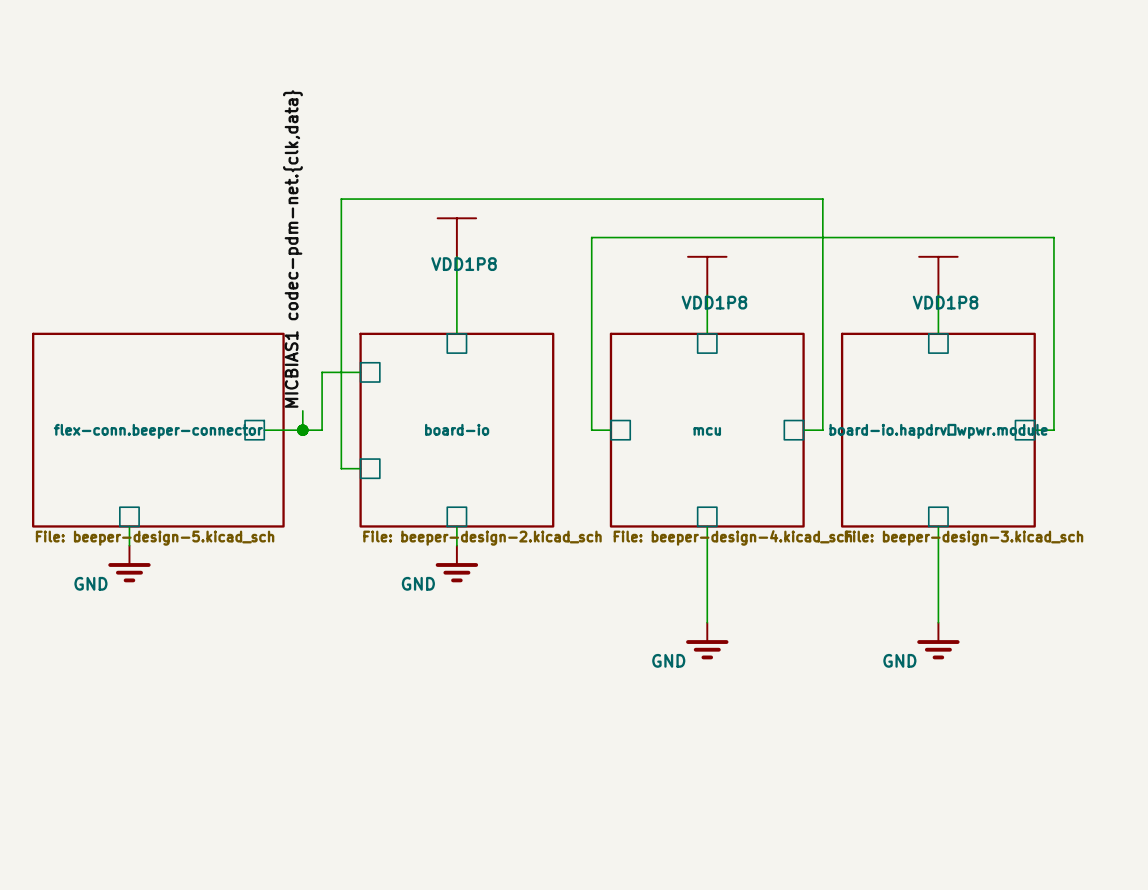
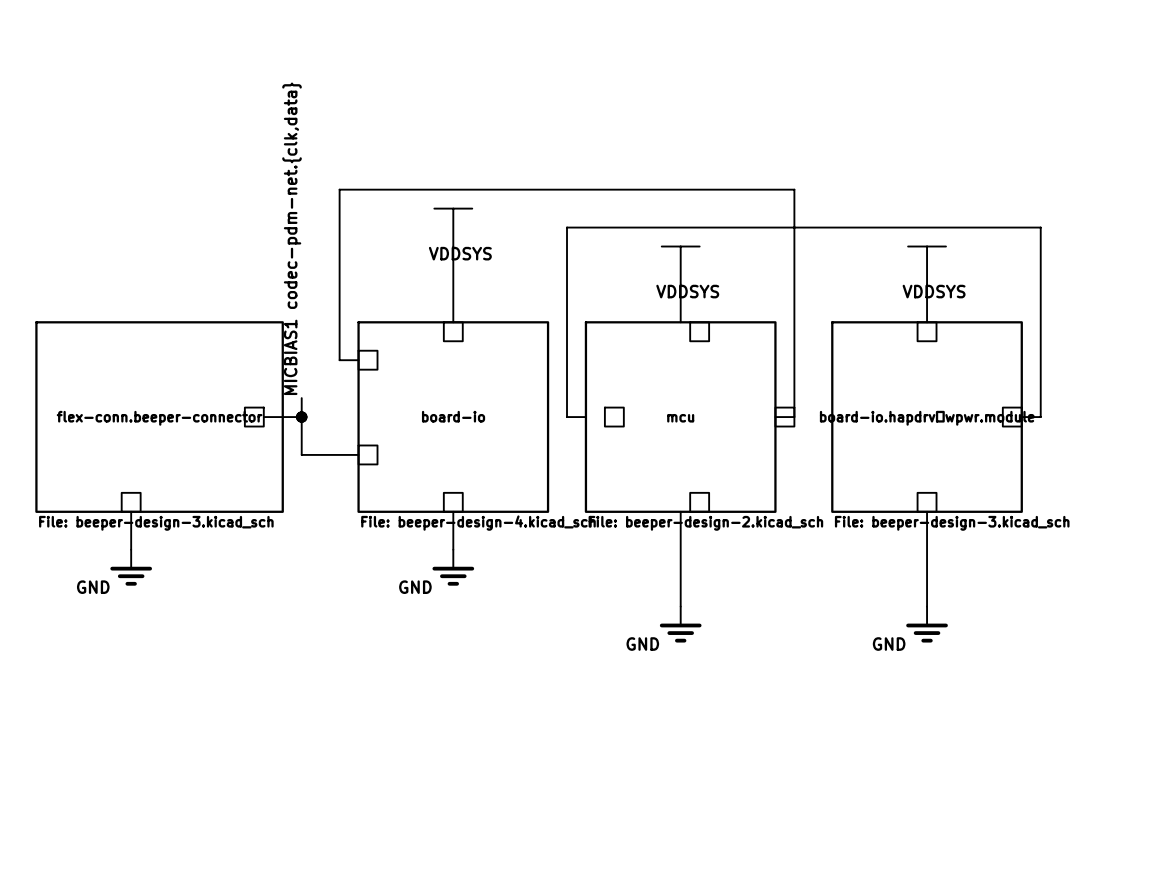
wire: (803, 199) (822, 199) (822, 430) (803, 430) -> (794, 189) (794, 417) (775, 417)
power symbol: VDD1P8 (456, 237) -> VDDSYS (453, 227)
wire: (591, 237) (591, 430) (610, 430) -> (585, 227) (567, 227) (567, 417) (585, 417)
power symbol: none -> VDDSYS (680, 265)
power symbol: VDD1P8 (707, 276) -> none
power symbol: VDD1P8 (938, 276) -> VDDSYS (927, 265)
wire: (707, 295) (707, 333) -> (680, 284) (680, 322)
wire: (302, 430) (322, 430) (322, 372) (341, 372) (341, 468) -> (301, 417) (301, 454) (339, 454)
sheet mcu: none -> File: beeper-design-2.kicad_sch (680, 417)
sheet mcu: File: beeper-design-4.kicad_sch (707, 430) -> none
wire: (707, 526) (707, 622) -> (680, 511) (680, 606)
sheet flex-conn.beeper-connector value: File: beeper-design-5.kicad_sch (155, 538) -> File: beeper-design-3.kicad_sch (156, 523)
sheet board-io value: File: beeper-design-2.kicad_sch (482, 538) -> File: beeper-design-4.kicad_sch (478, 523)
power symbol position: GND (129, 563) -> GND (131, 567)
power symbol position: GND (456, 563) -> GND (453, 567)
power symbol position: GND (707, 640) -> GND (680, 624)

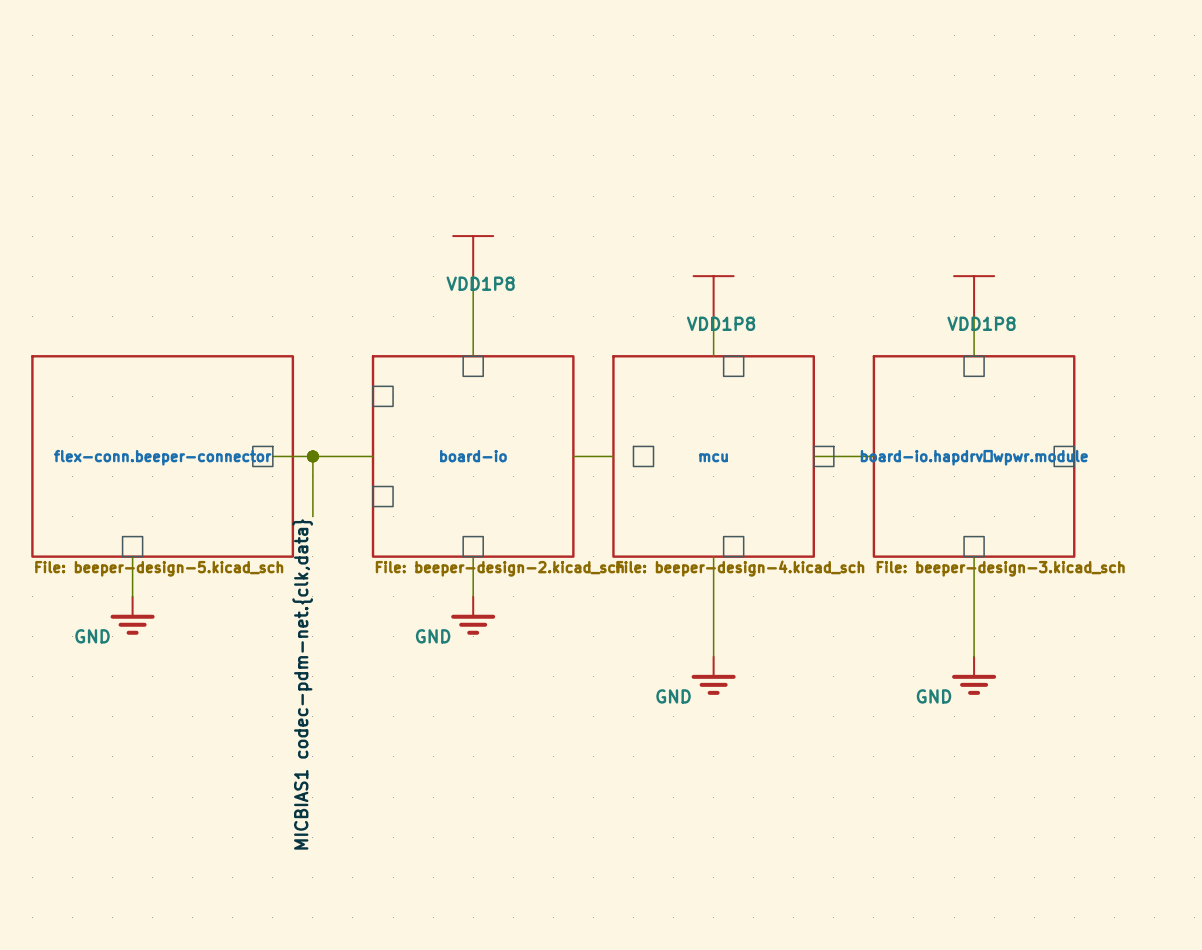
power symbol: VDDSYS (453, 227) -> VDD1P8 (473, 256)
label position: MICBIAS1 codec-pdm-net.{clk,data} (292, 238) -> MICBIAS1 codec-pdm-net.{clk,data} (302, 684)
power symbol: VDDSYS (680, 265) -> VDD1P8 (713, 296)
power symbol: VDDSYS (927, 265) -> VDD1P8 (974, 296)
wire: (358, 360) (339, 360) (339, 189) (794, 189) (794, 417) -> (873, 456) (833, 456)
wire: (301, 398) (301, 417) -> (373, 456) (312, 456)
wire: (567, 417) (567, 227) (1040, 227) (1040, 417) (1021, 417) -> (593, 456) (573, 456)
wire: (301, 454) (358, 454) -> (312, 496) (312, 516)
sheet flex-conn.beeper-connector value: File: beeper-design-3.kicad_sch (156, 523) -> File: beeper-design-5.kicad_sch (159, 568)
sheet board-io value: File: beeper-design-4.kicad_sch (478, 523) -> File: beeper-design-2.kicad_sch (499, 568)
sheet mcu value: File: beeper-design-2.kicad_sch (705, 523) -> File: beeper-design-4.kicad_sch (740, 568)

